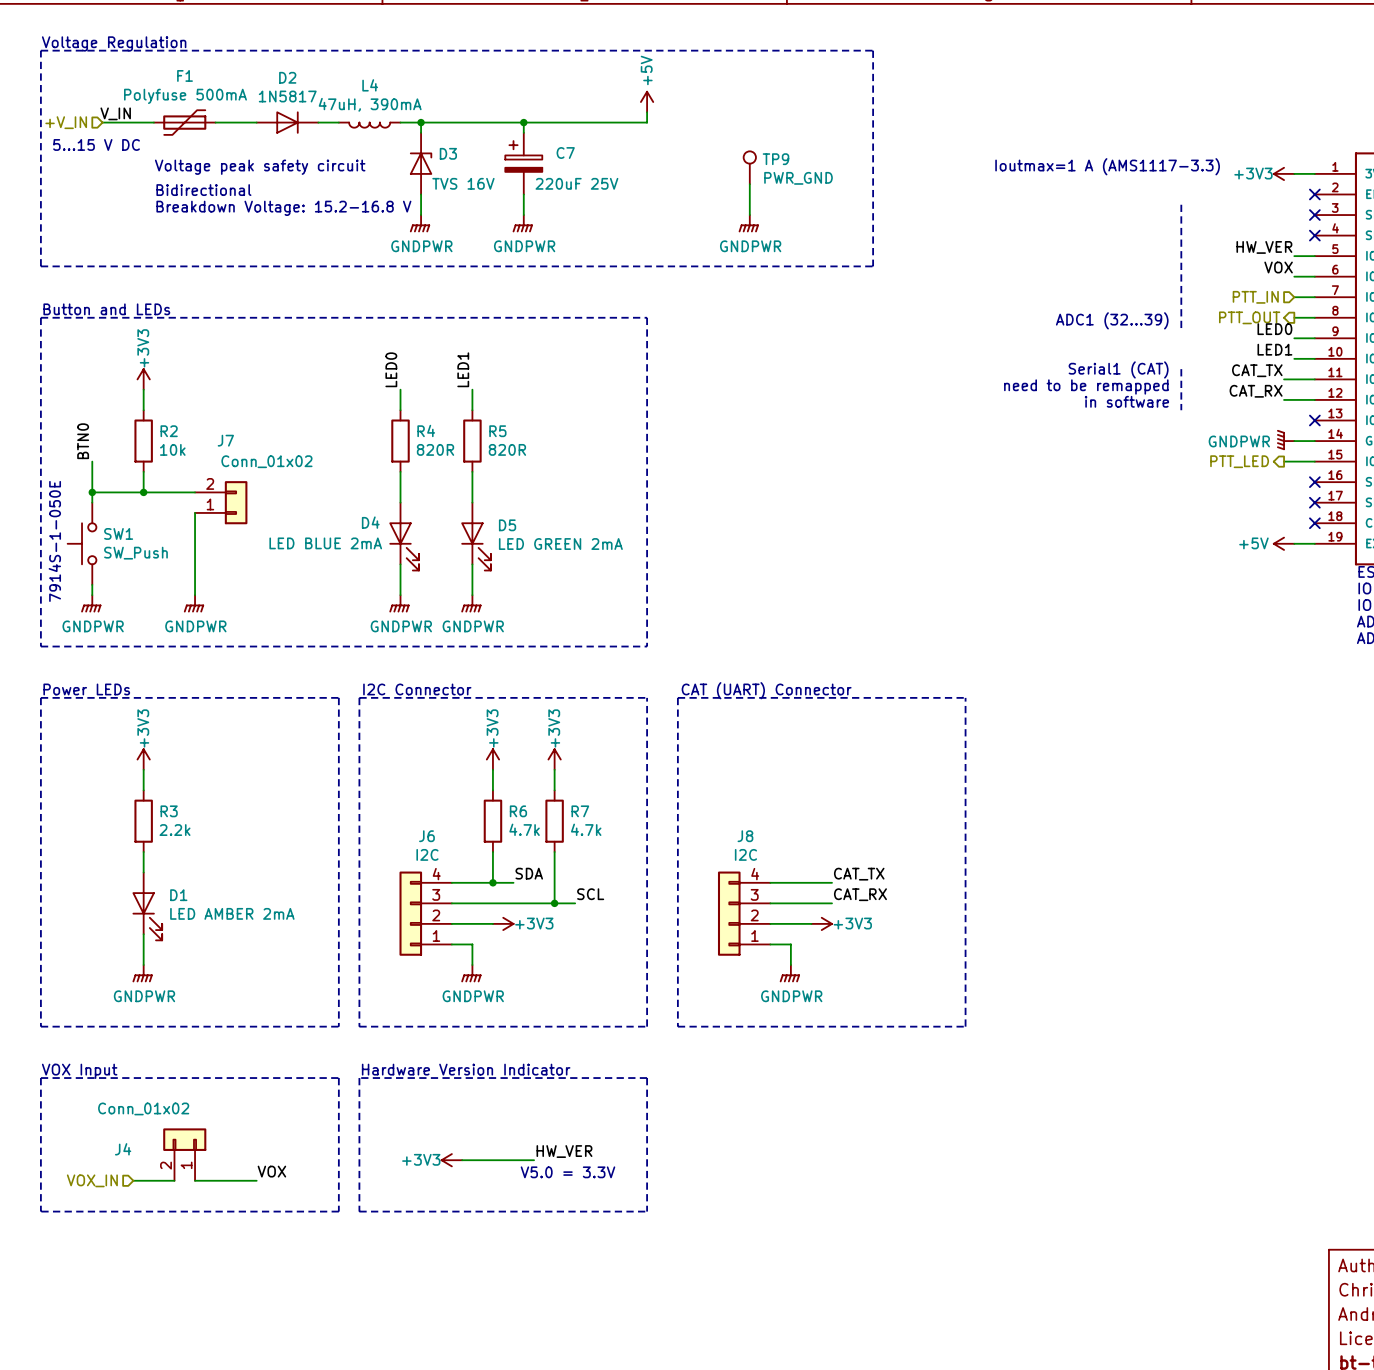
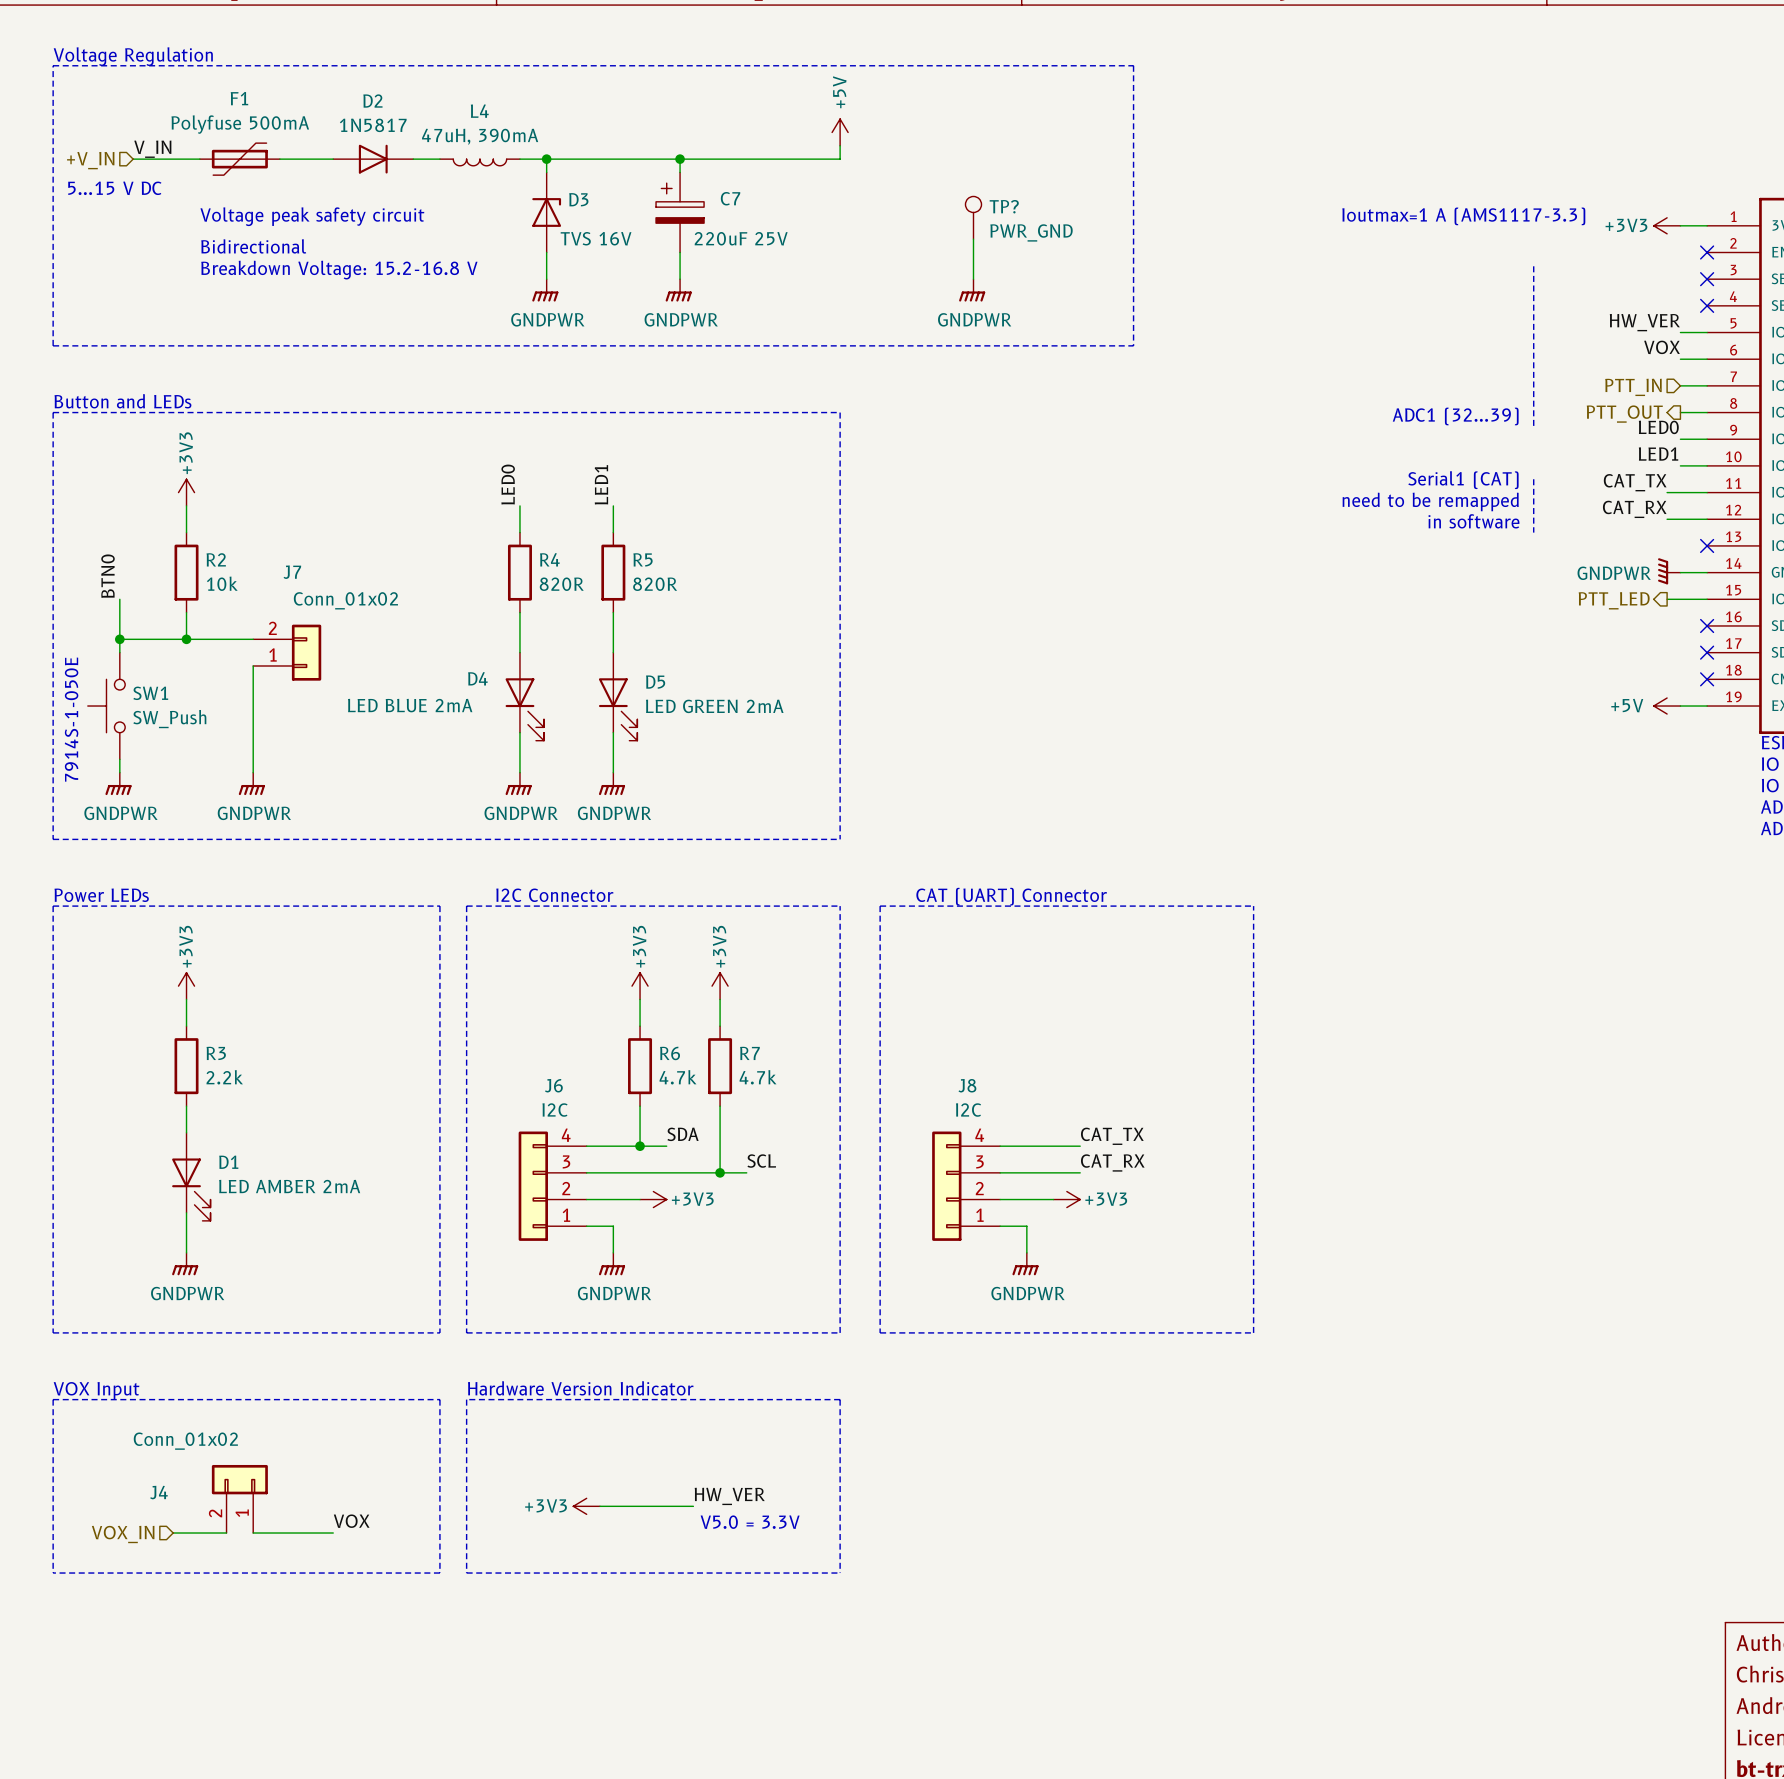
TP9 name: TP9 (775, 159) -> TP? (1004, 206)

